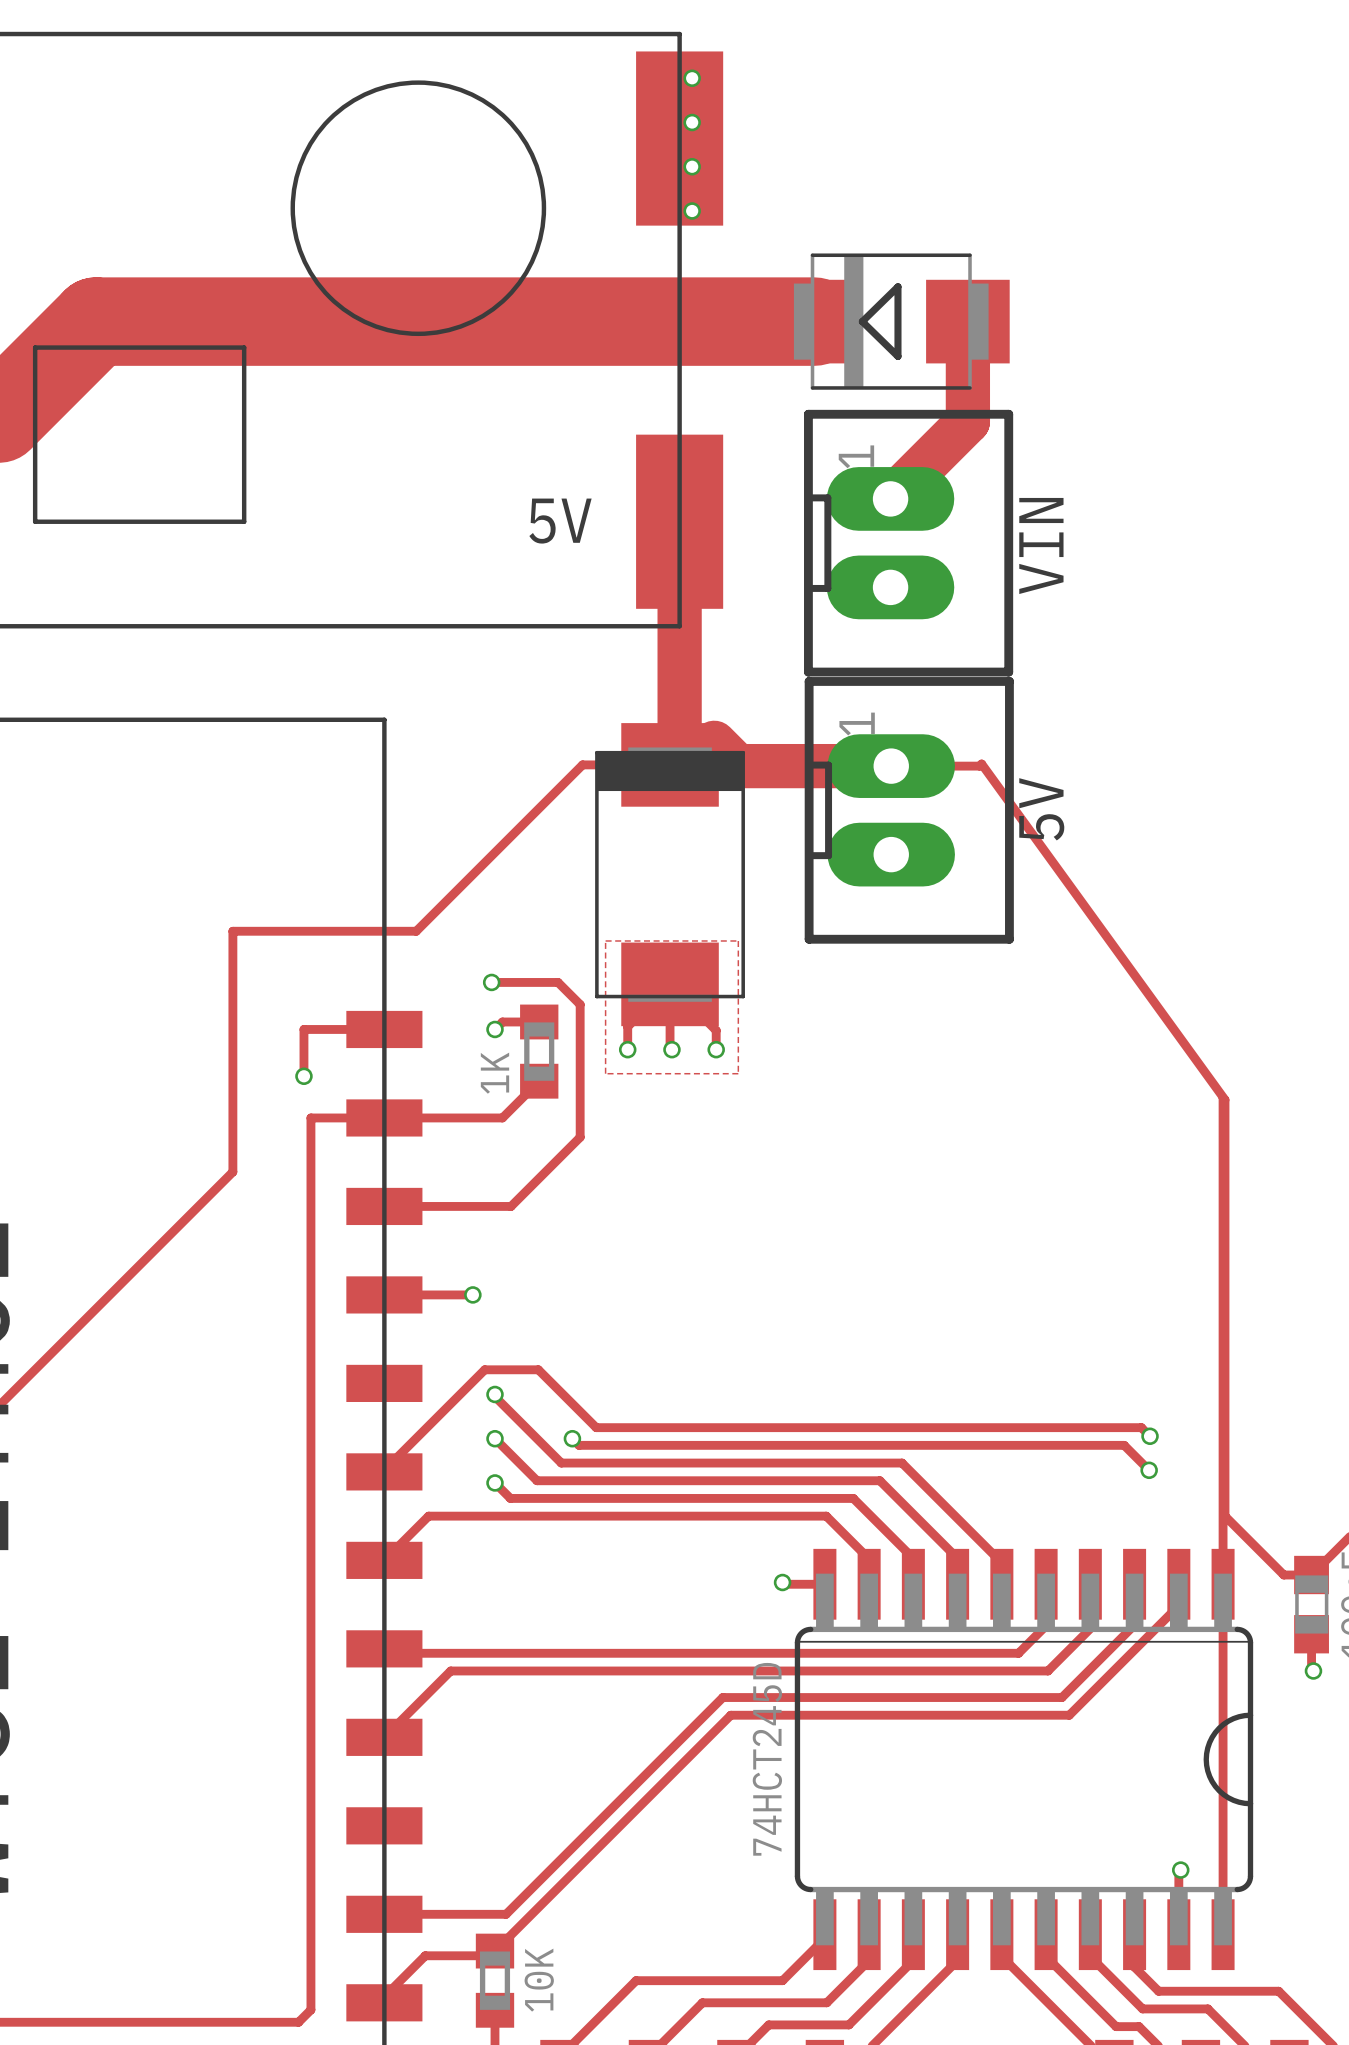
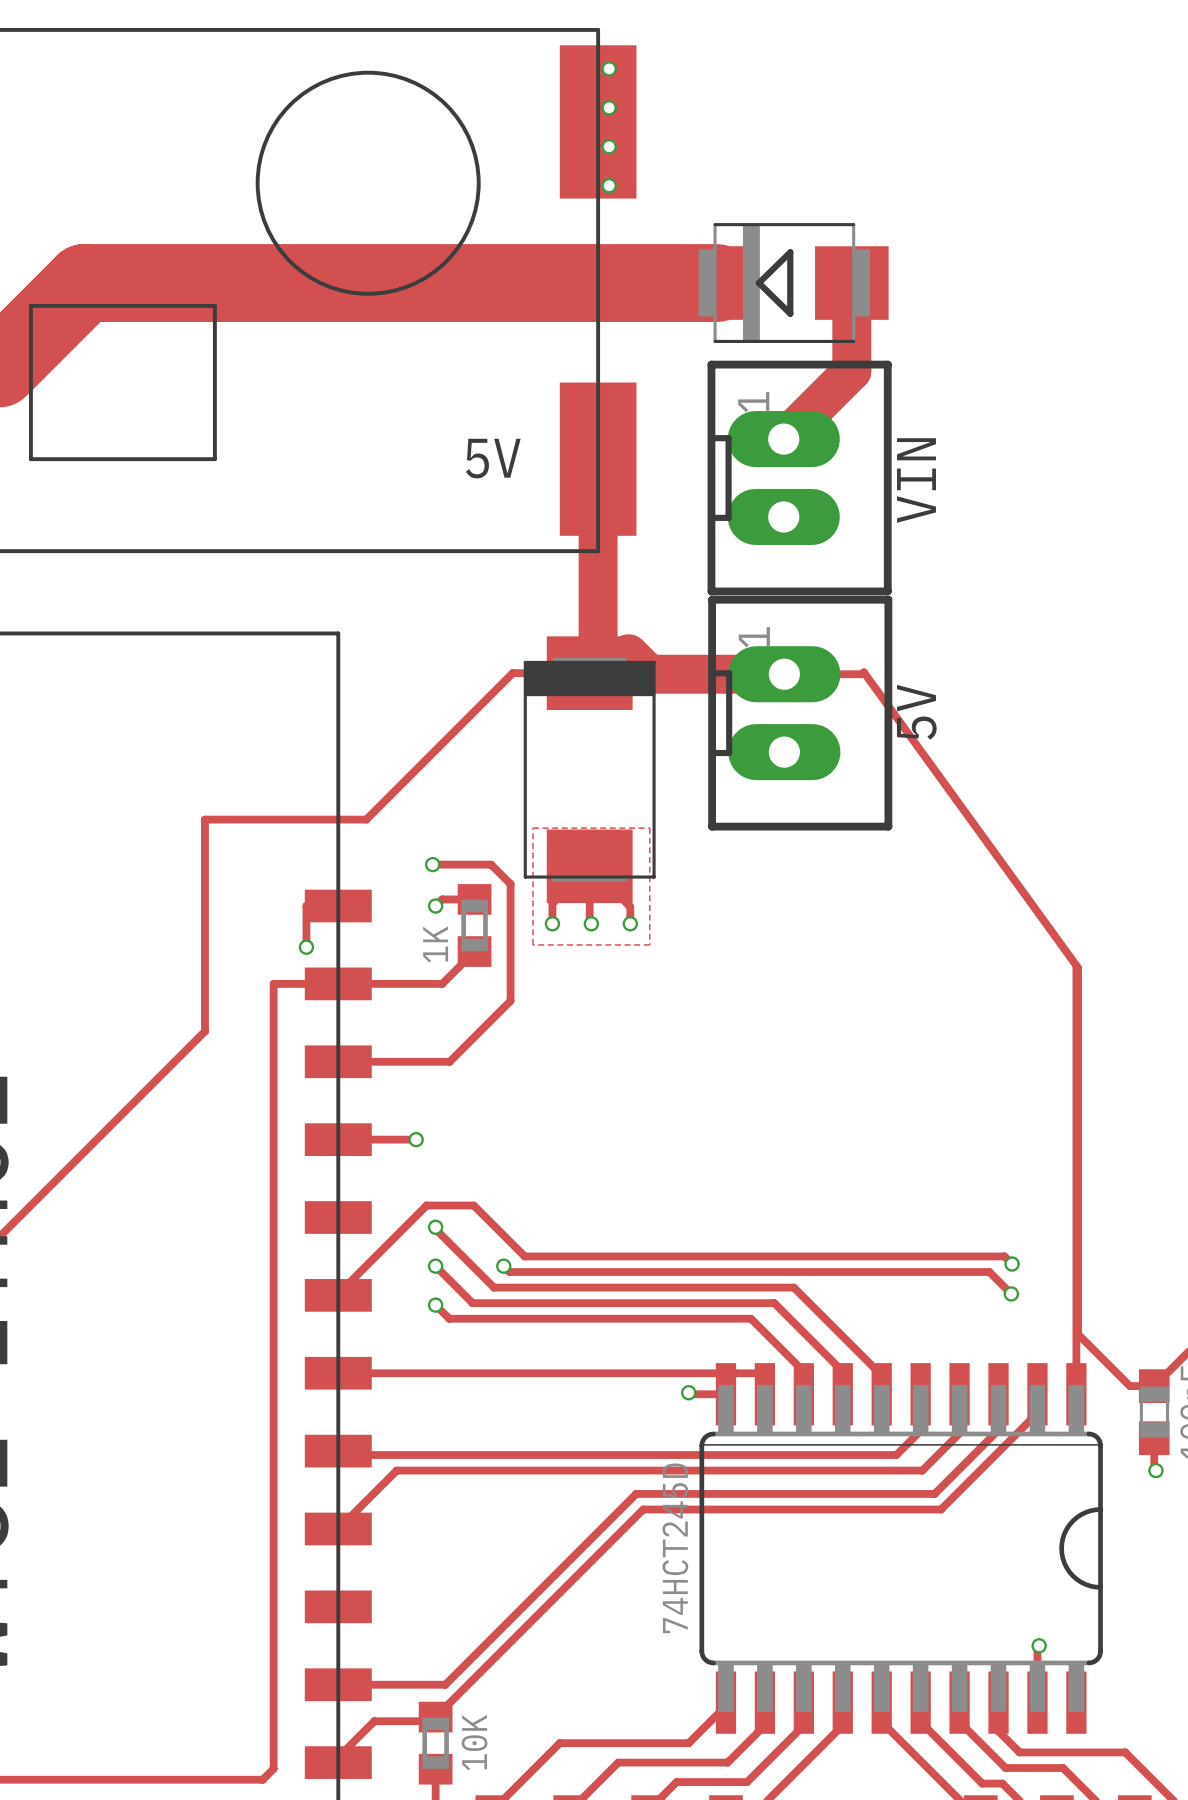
track: (348, 1029) (303, 1029) (303, 1076) -> (306, 906) (306, 947)
via position: (303, 1076) -> (306, 947)
track: (384, 1560) (428, 1516) (826, 1516) (869, 1558) (869, 1584) -> (338, 1373) (766, 1373) (766, 1392) (764, 1394)
track: (1223, 1584) (1223, 1934) -> none

